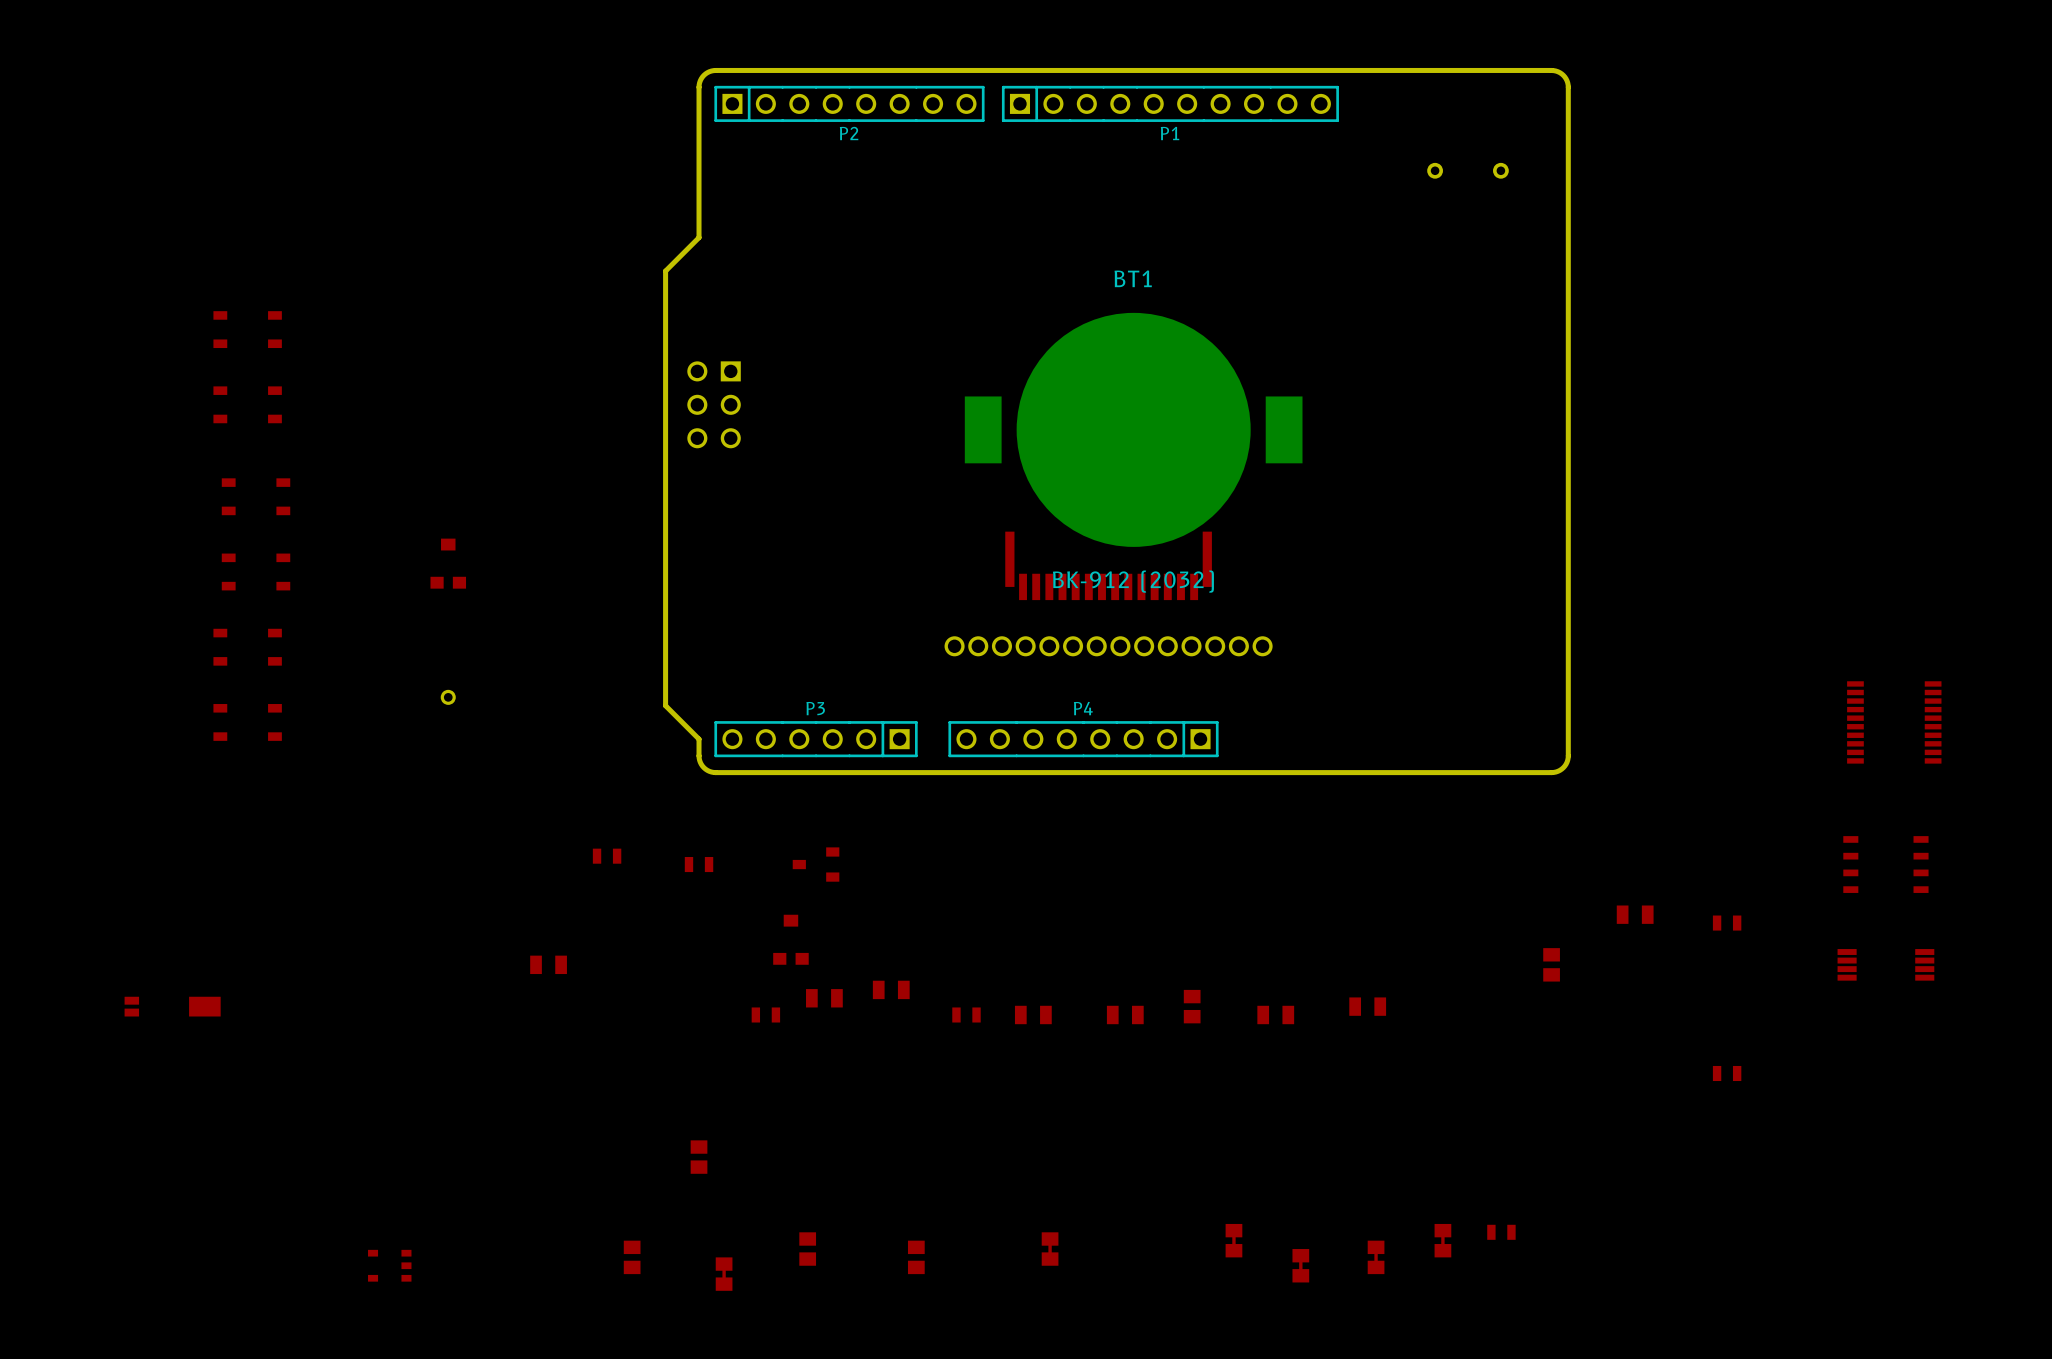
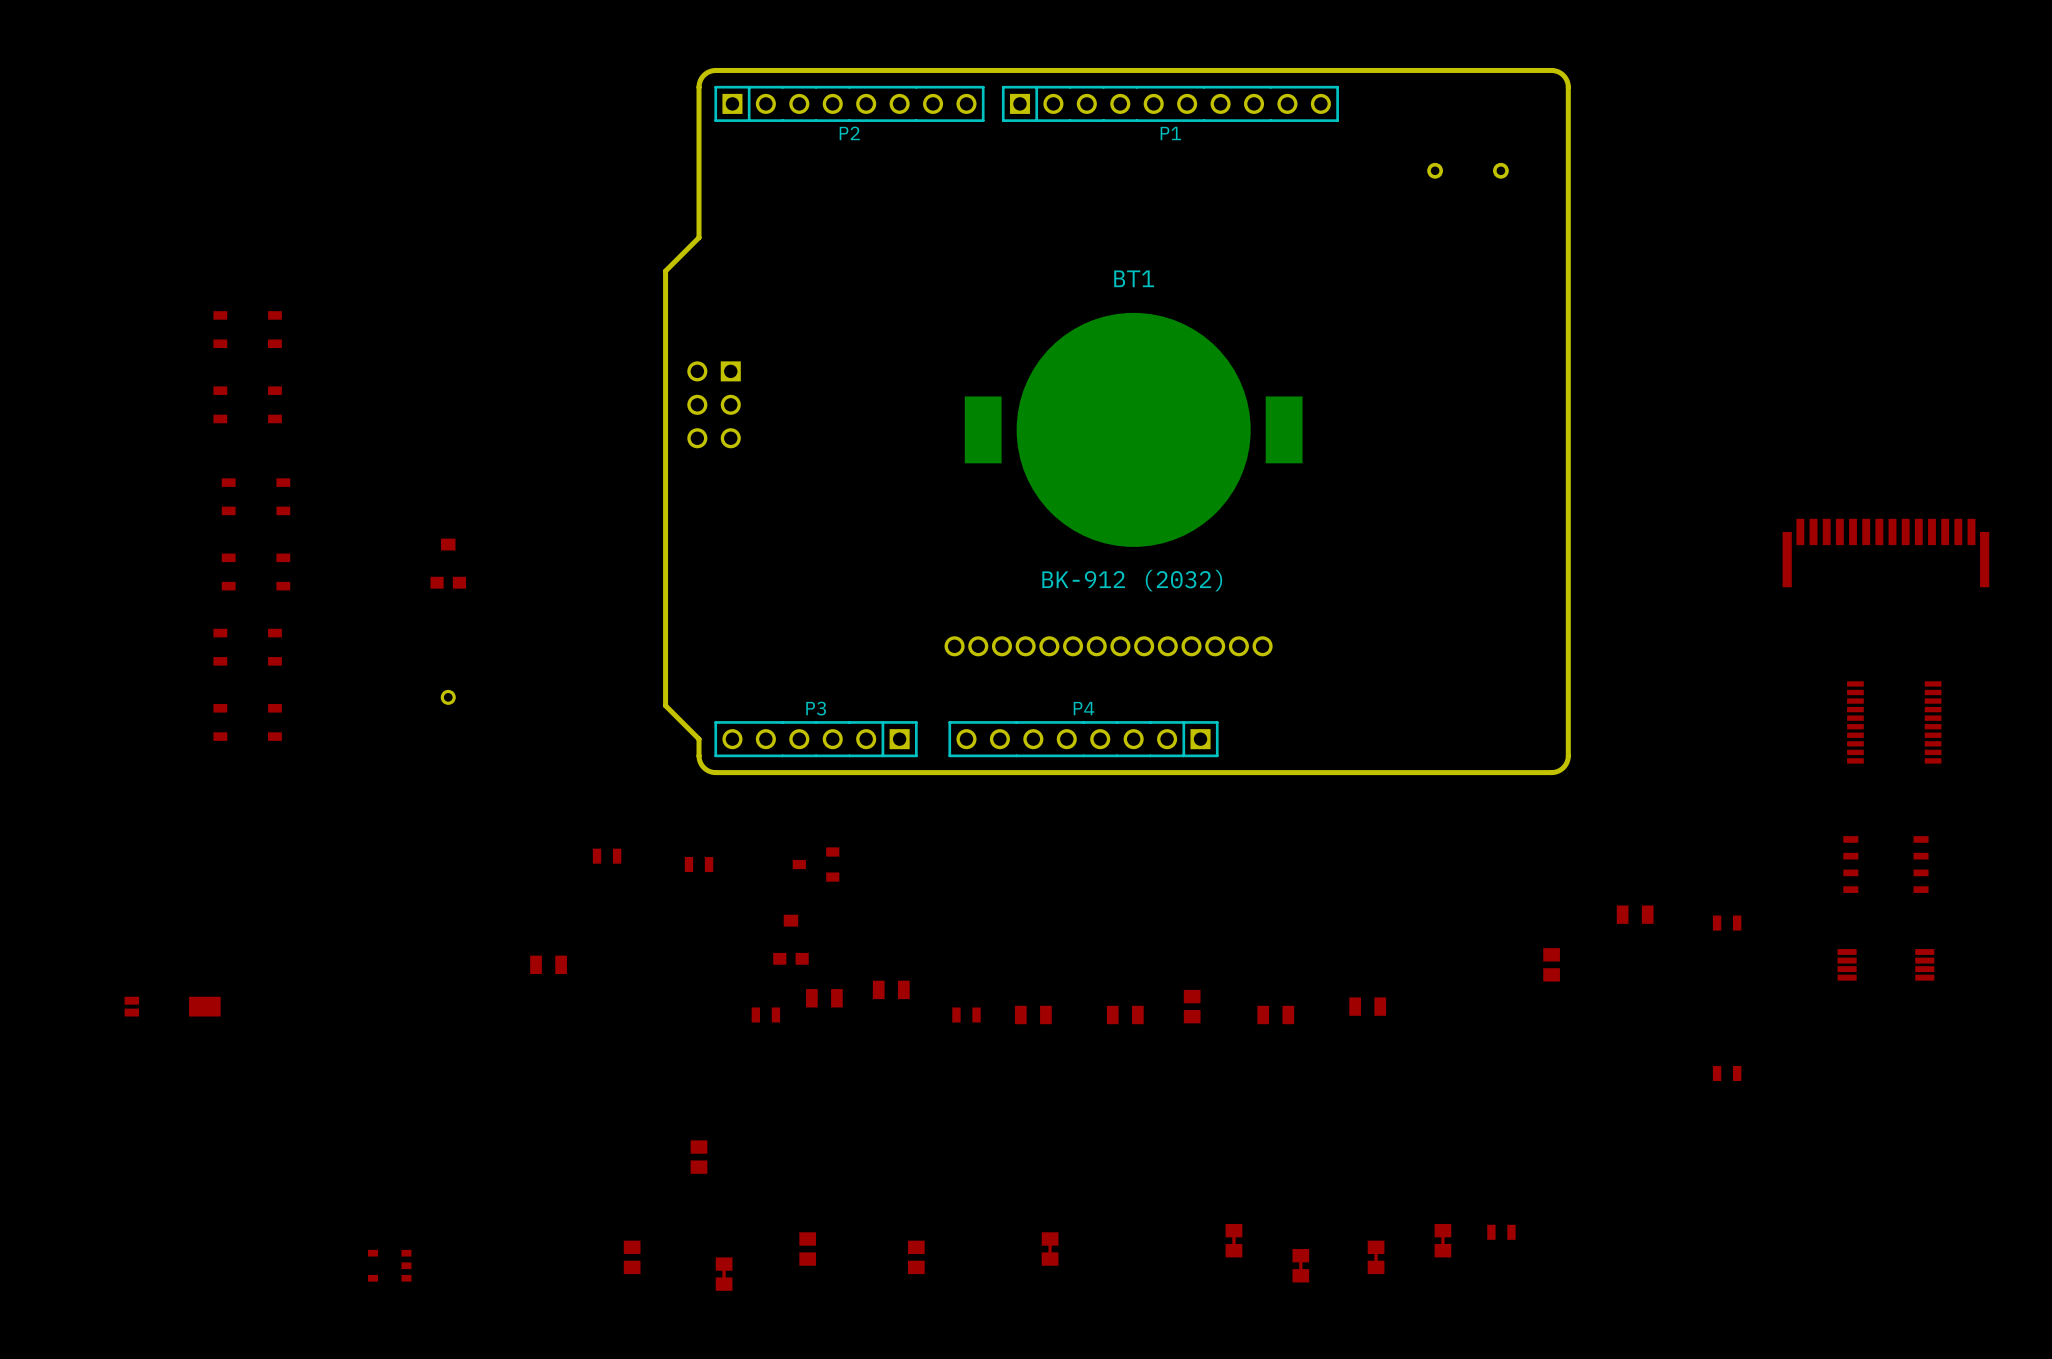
part: none -> (1885, 553)
part: (1108, 565) -> none

